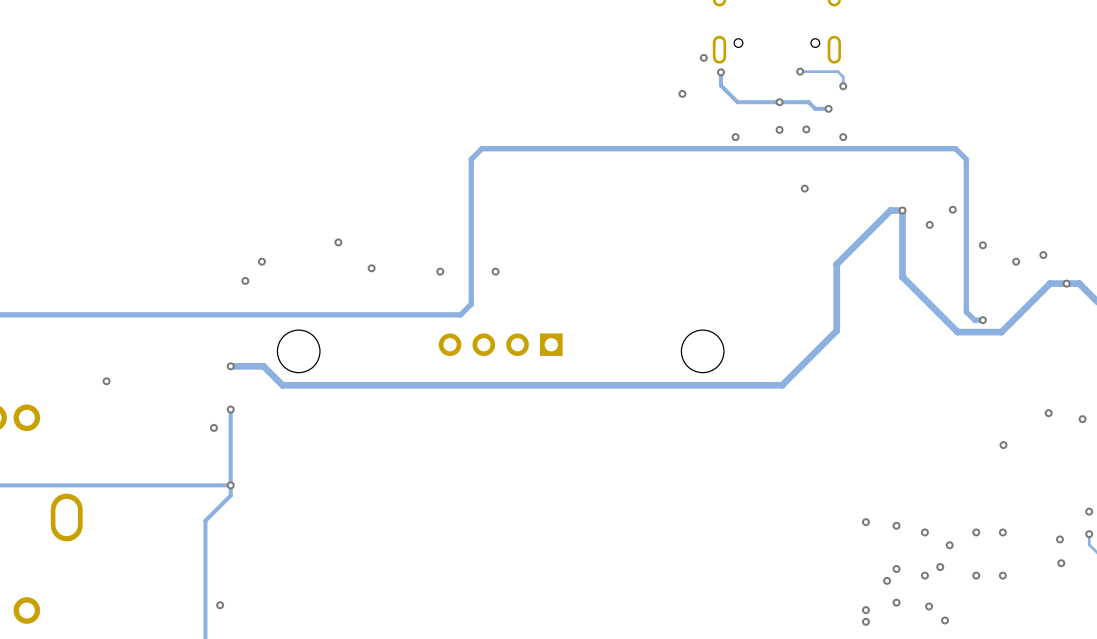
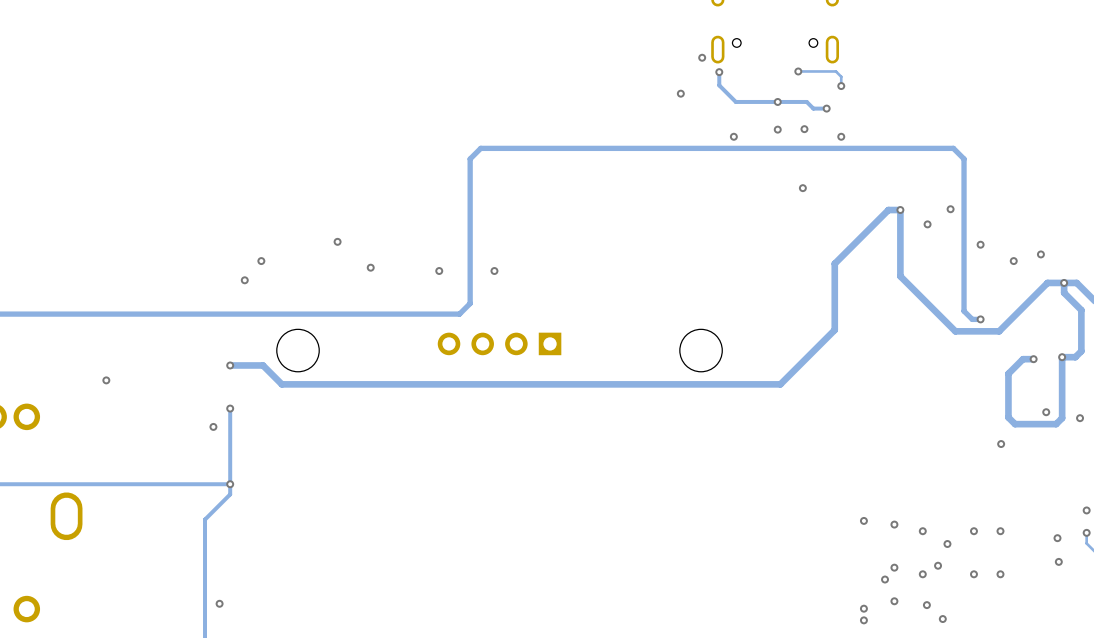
track: none -> (1064, 282) (1064, 292) (1081, 310) (1081, 351) (1075, 357) (1062, 357) (1062, 418) (1056, 424) (1015, 424) (1008, 417) (1008, 373) (1023, 359) (1033, 359)
via: none -> (1062, 357)
via: none -> (1033, 359)

